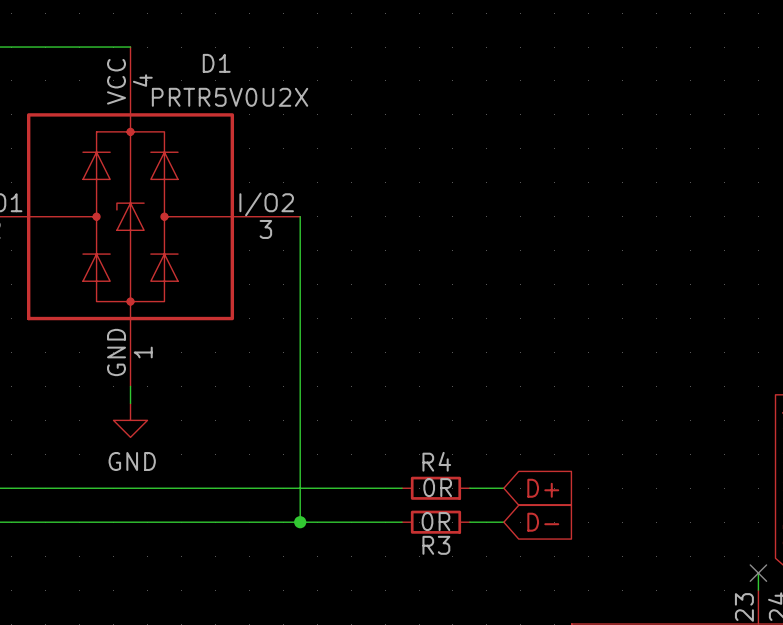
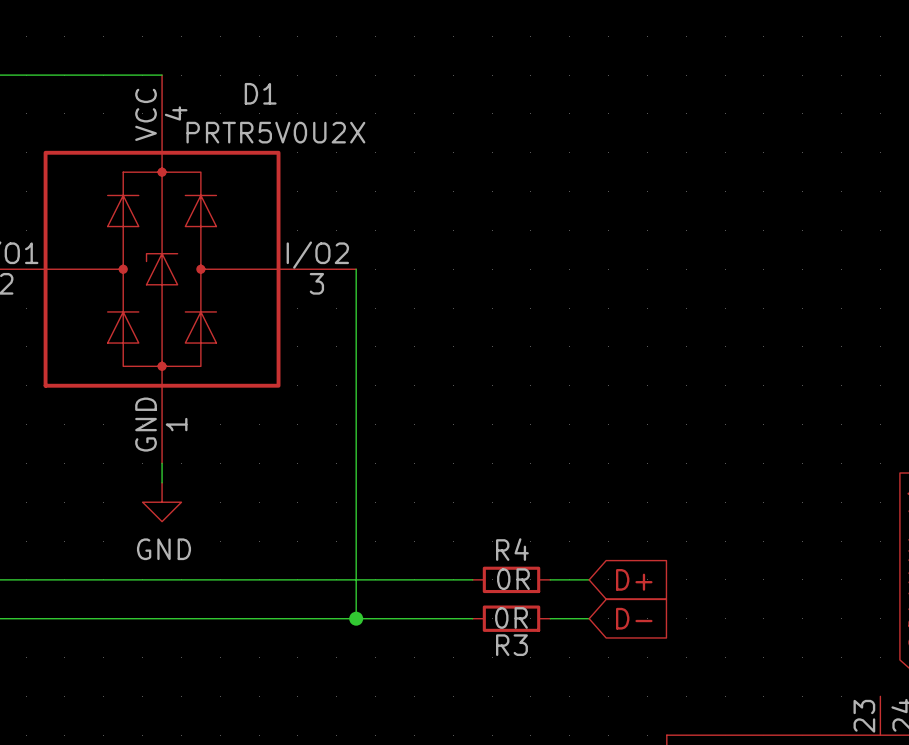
wire: (758, 573) (758, 590) -> none
no-connect mark: (758, 573) -> none

